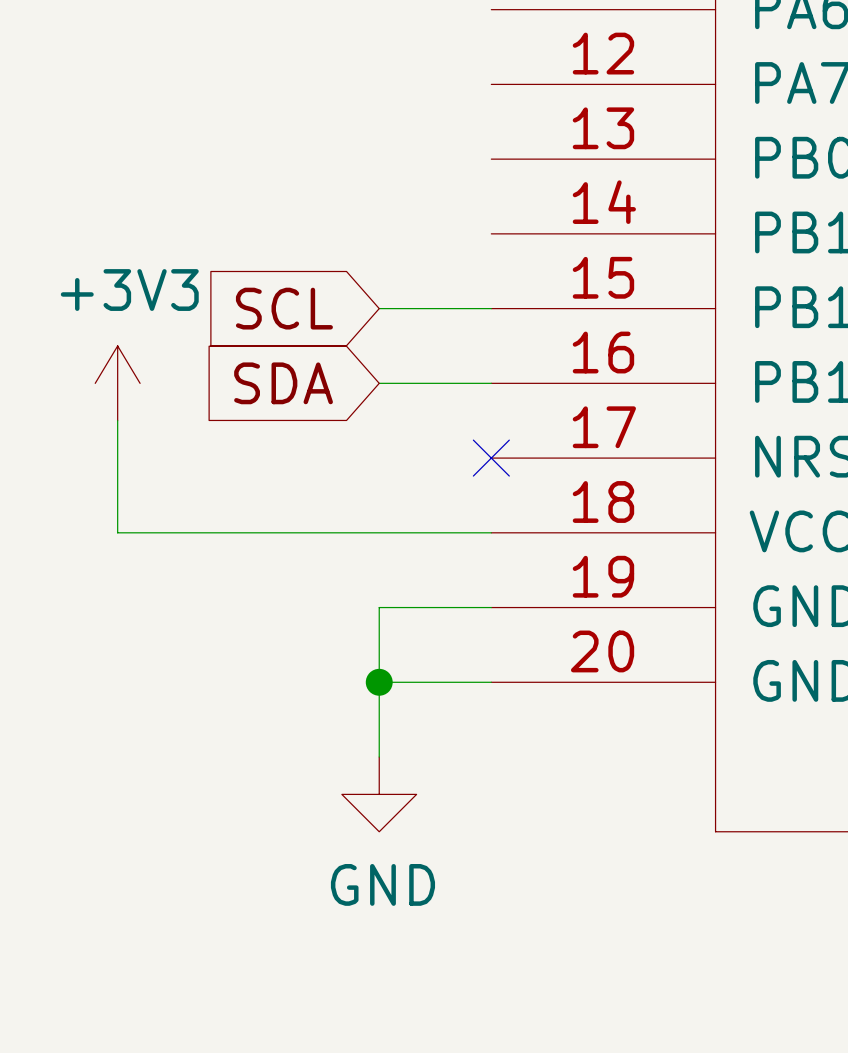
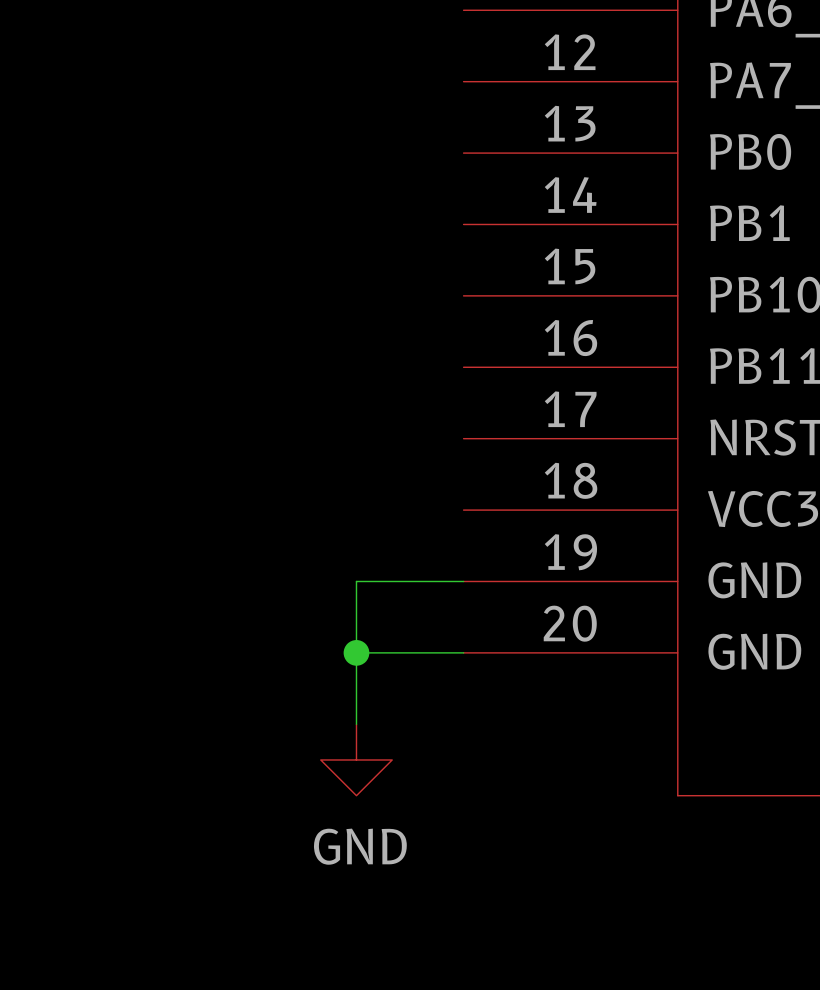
global label: SCL (284, 308) -> none
wire: (379, 308) (491, 308) -> none
power symbol: +3V3 (117, 383) -> none
global label: SDA (283, 383) -> none
wire: (379, 383) (491, 383) -> none
wire: (117, 420) (117, 532) (491, 532) -> none
no-connect mark: (491, 458) -> none

